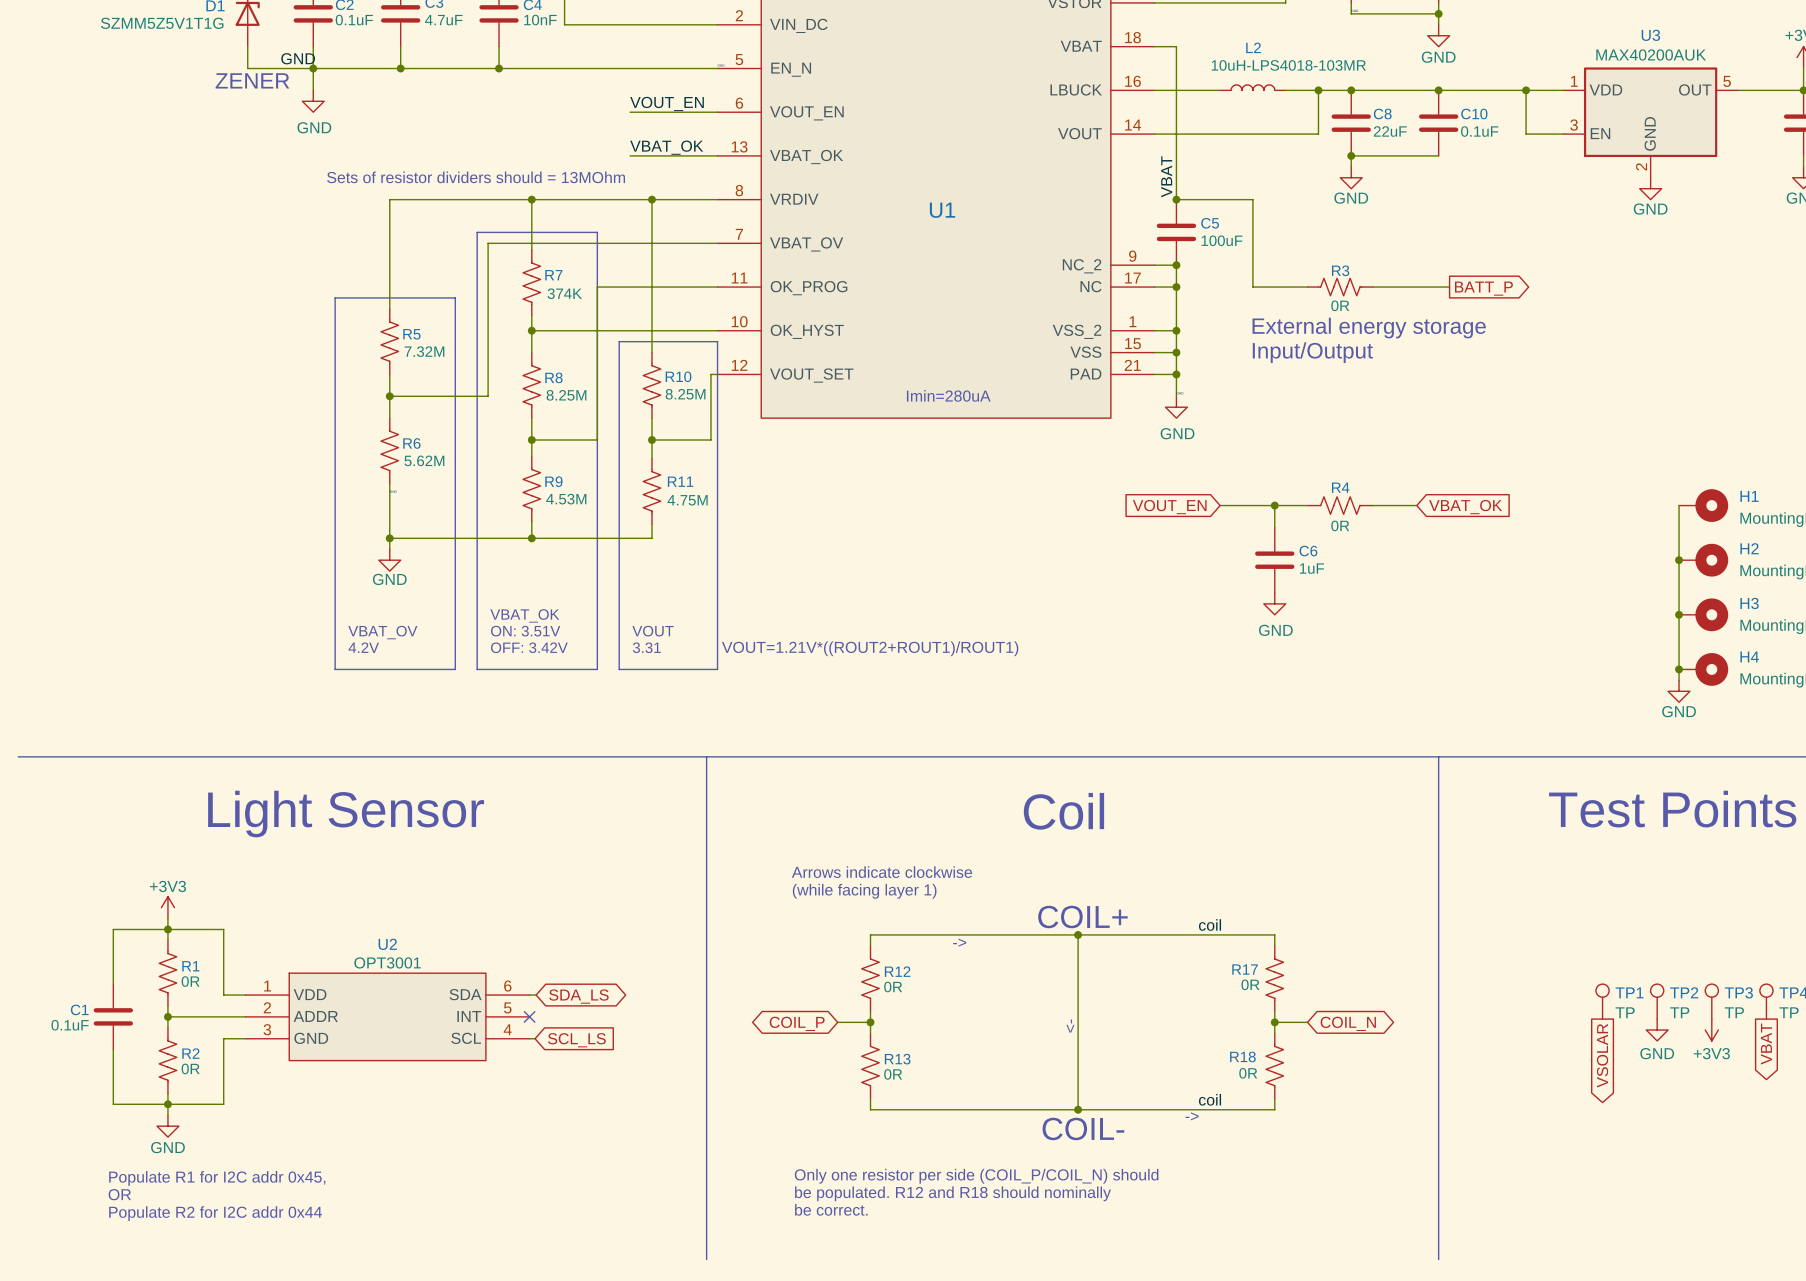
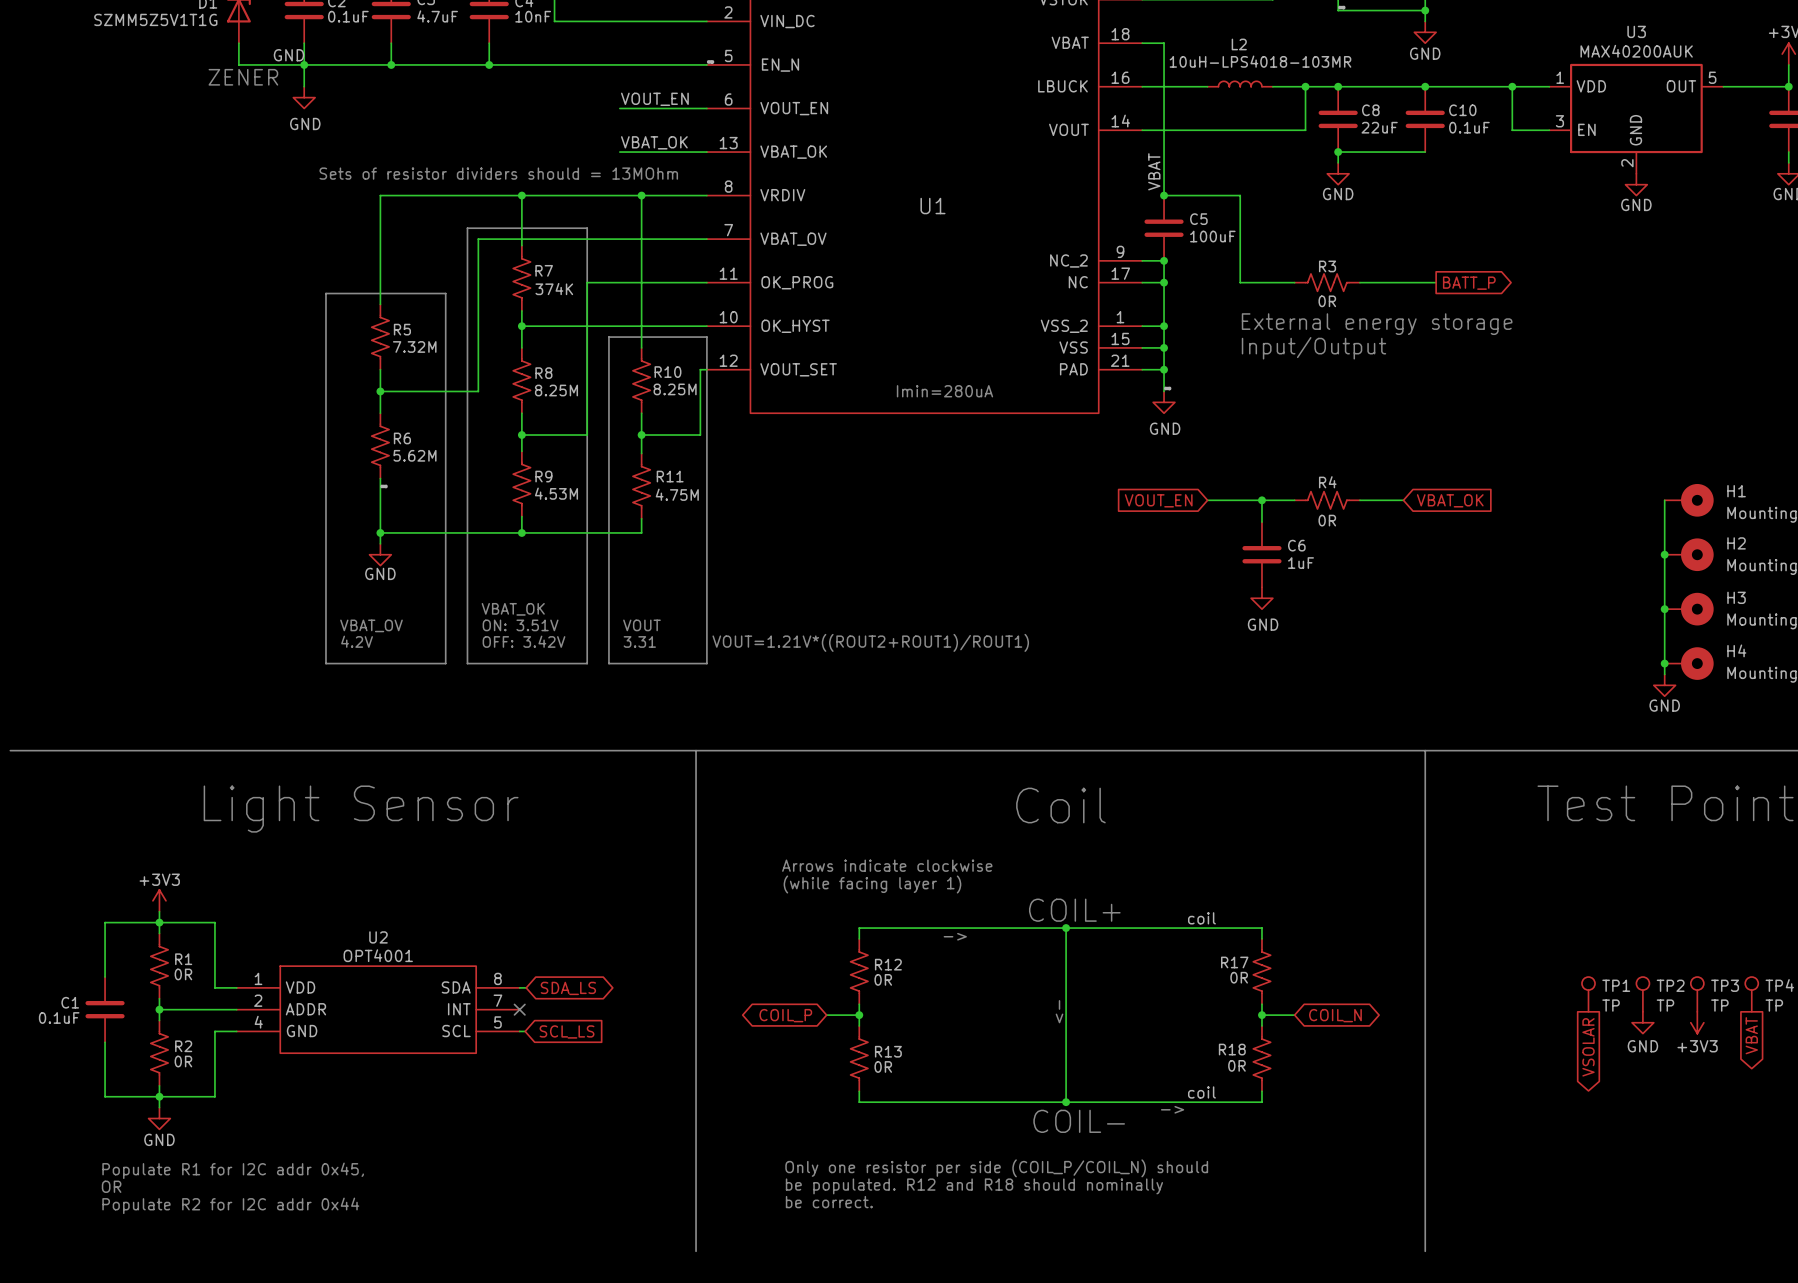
U2 value: OPT3001 (387, 962) -> OPT4001 (378, 955)
U2 pin number: 6 (507, 986) -> 8 (497, 978)
U2 pin number: 5 (507, 1007) -> 7 (497, 1000)
U2 pin number: 3 (267, 1029) -> 4 (258, 1022)
U2 pin number: 4 (507, 1029) -> 5 (497, 1022)

